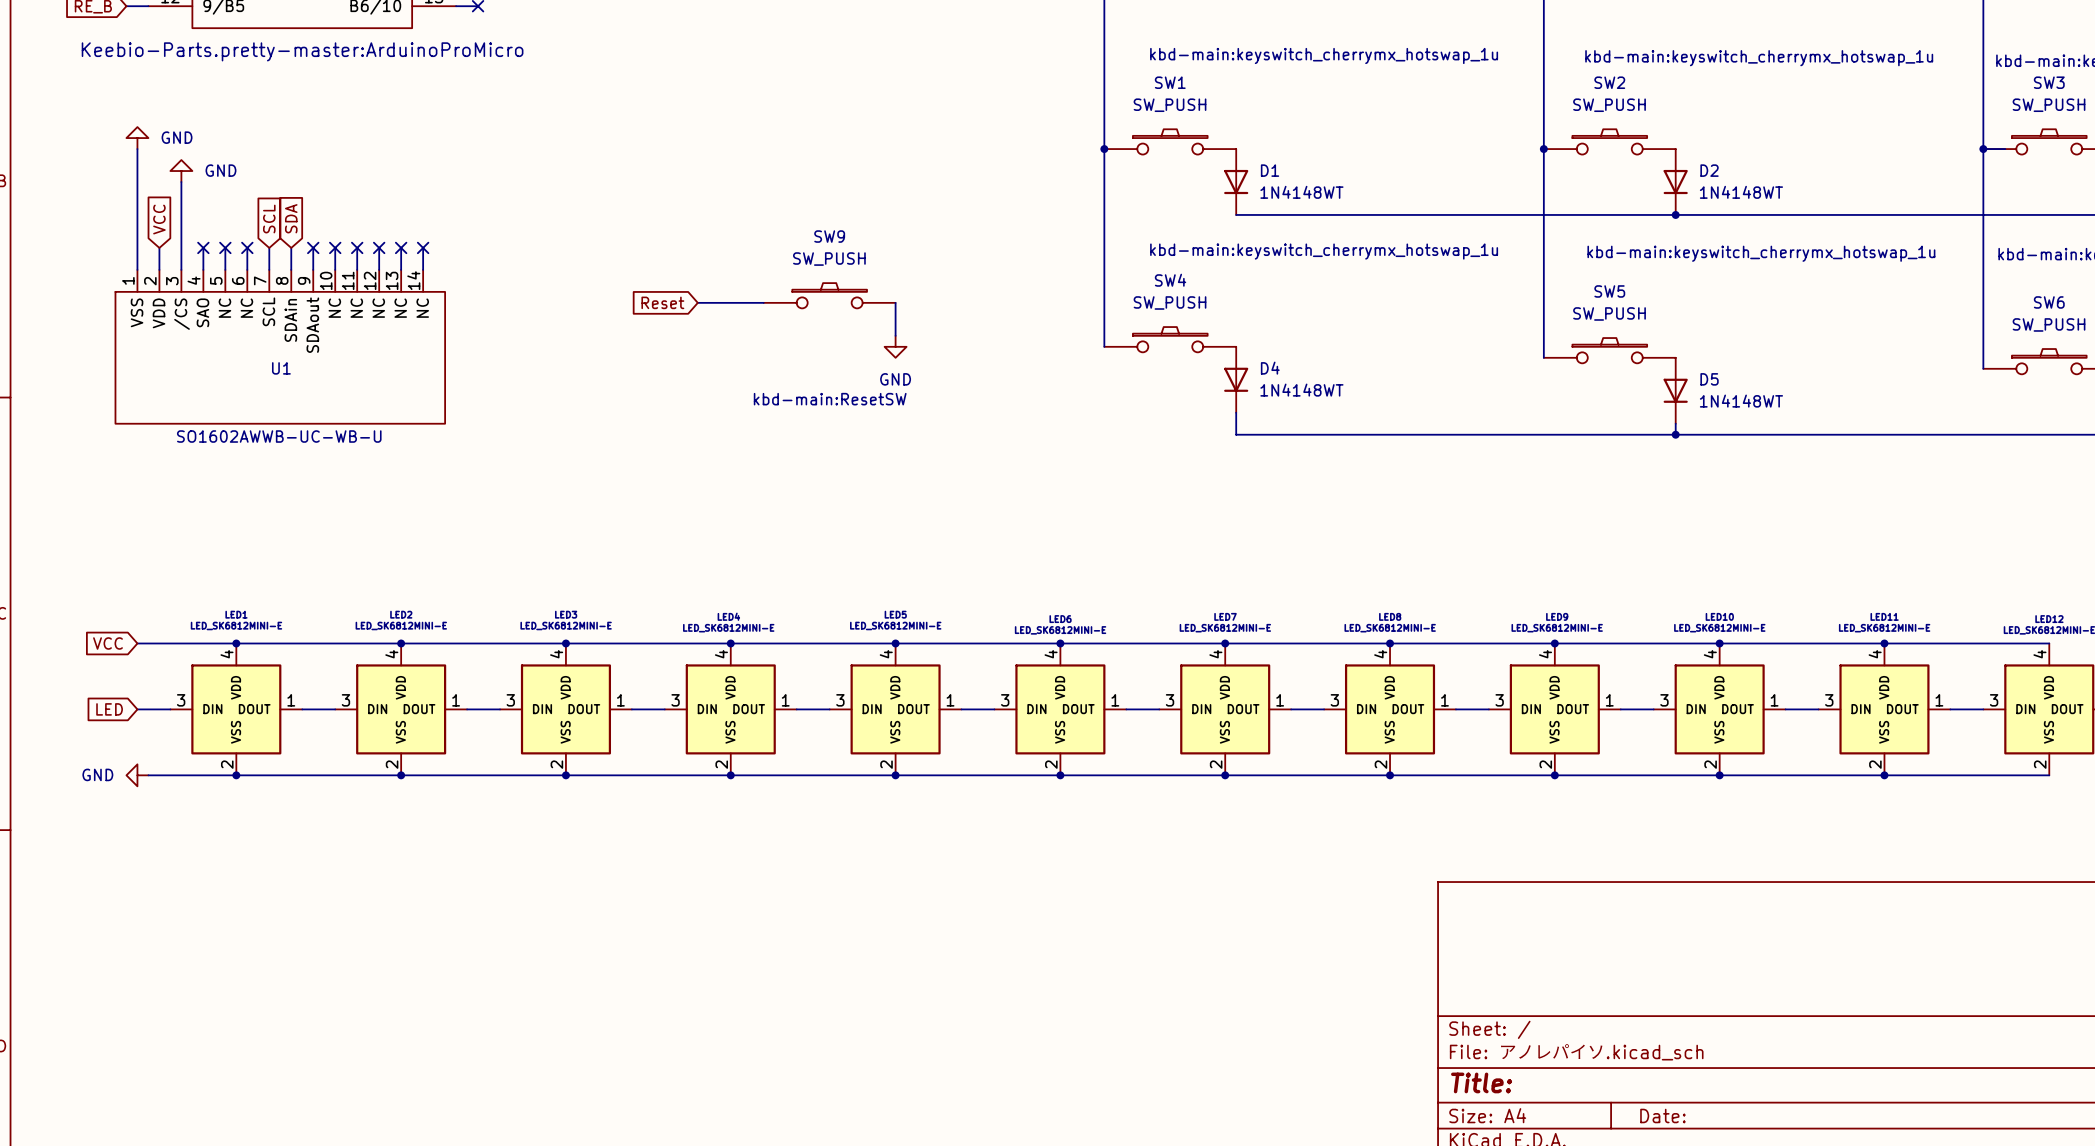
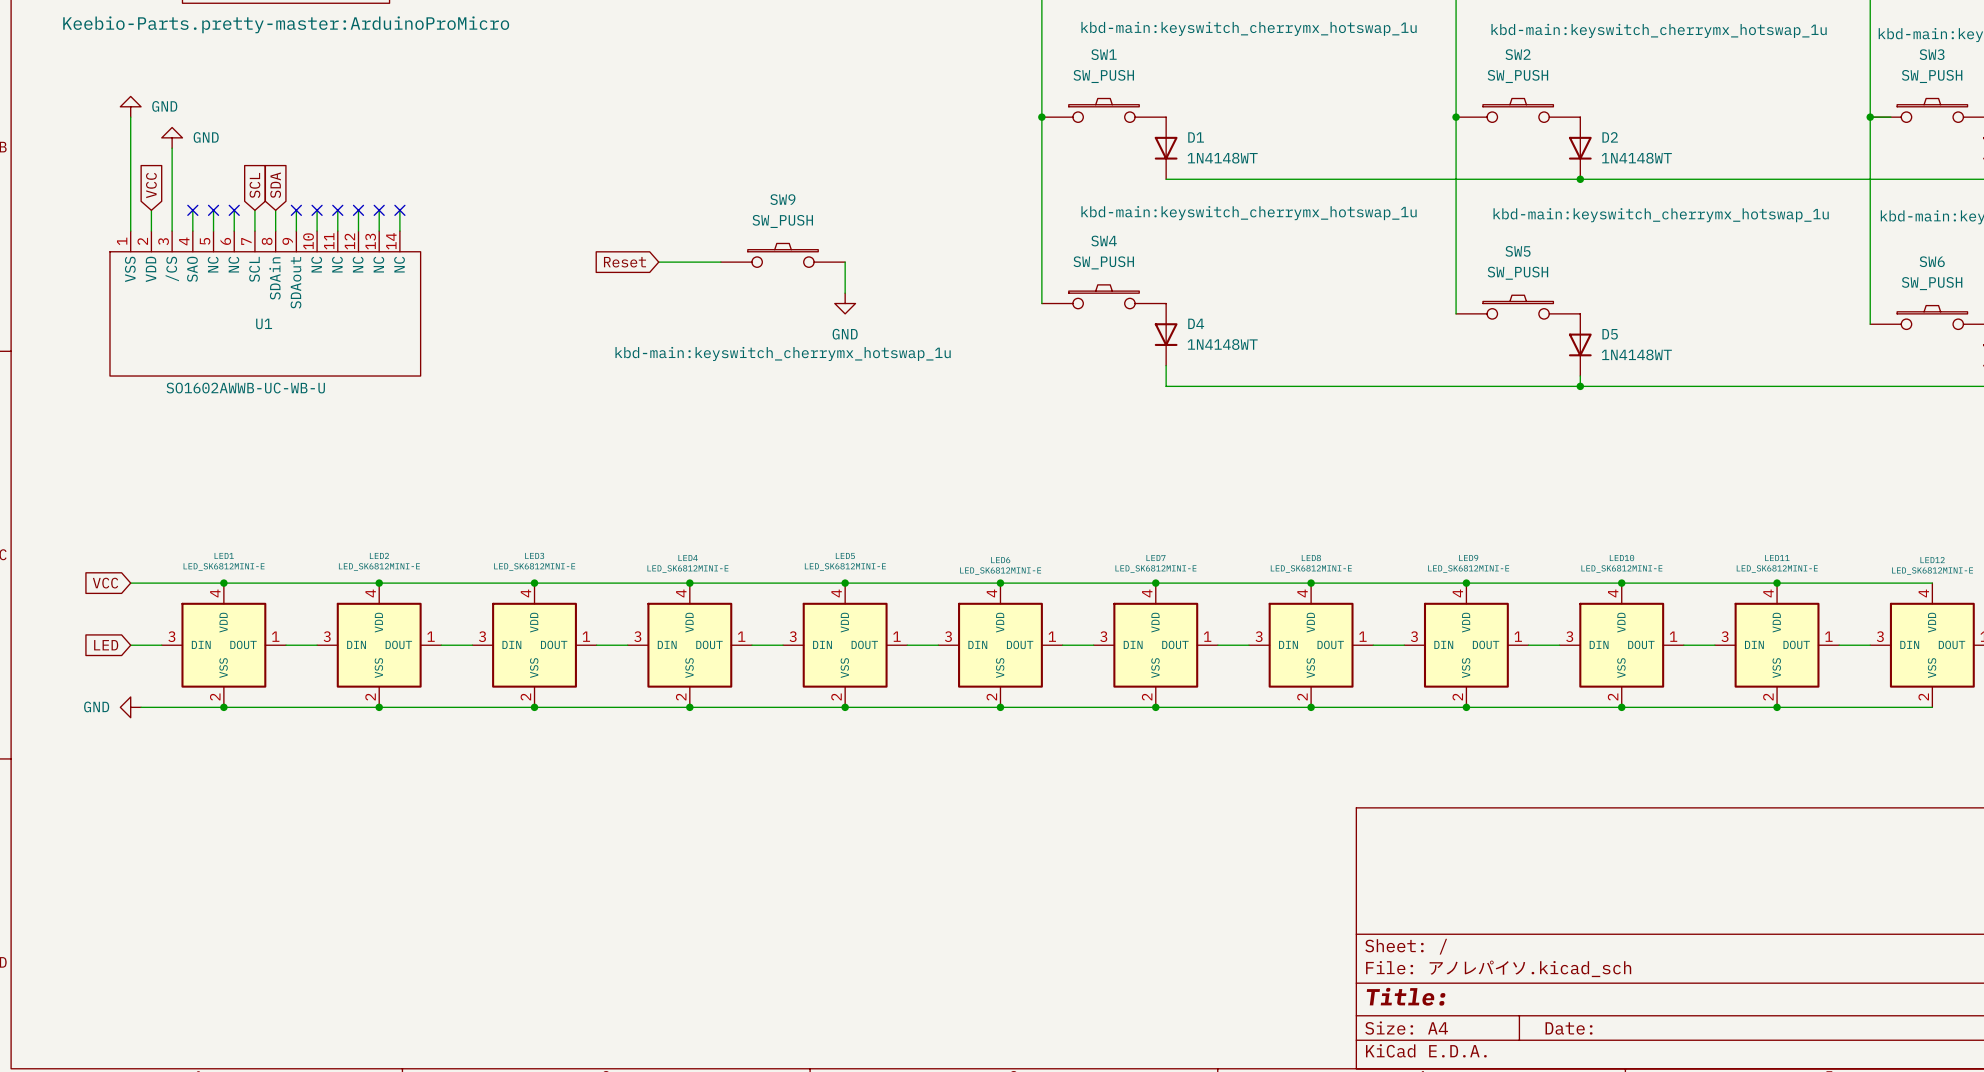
SW9 text: kbd-main:ResetSW (830, 399) -> kbd-main:keyswitch_cherrymx_hotswap_1u (783, 353)

